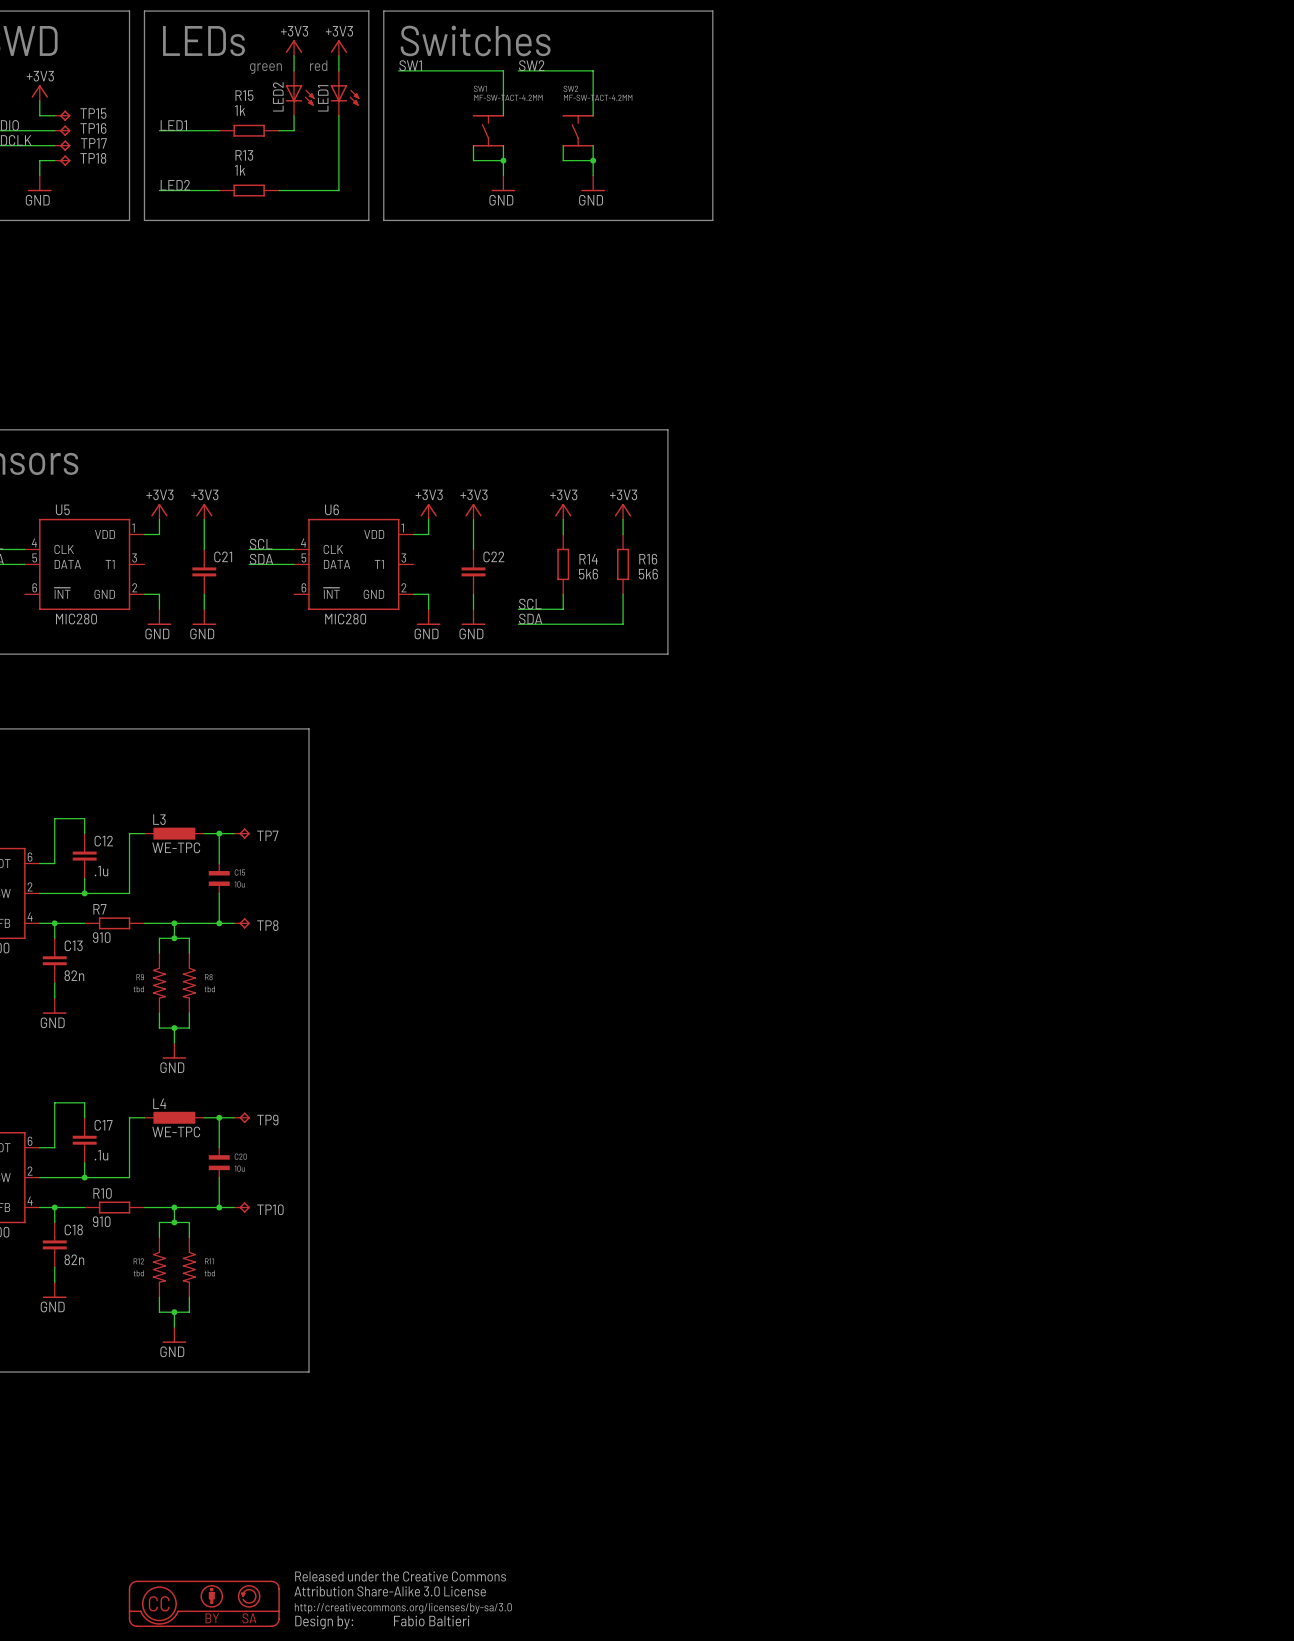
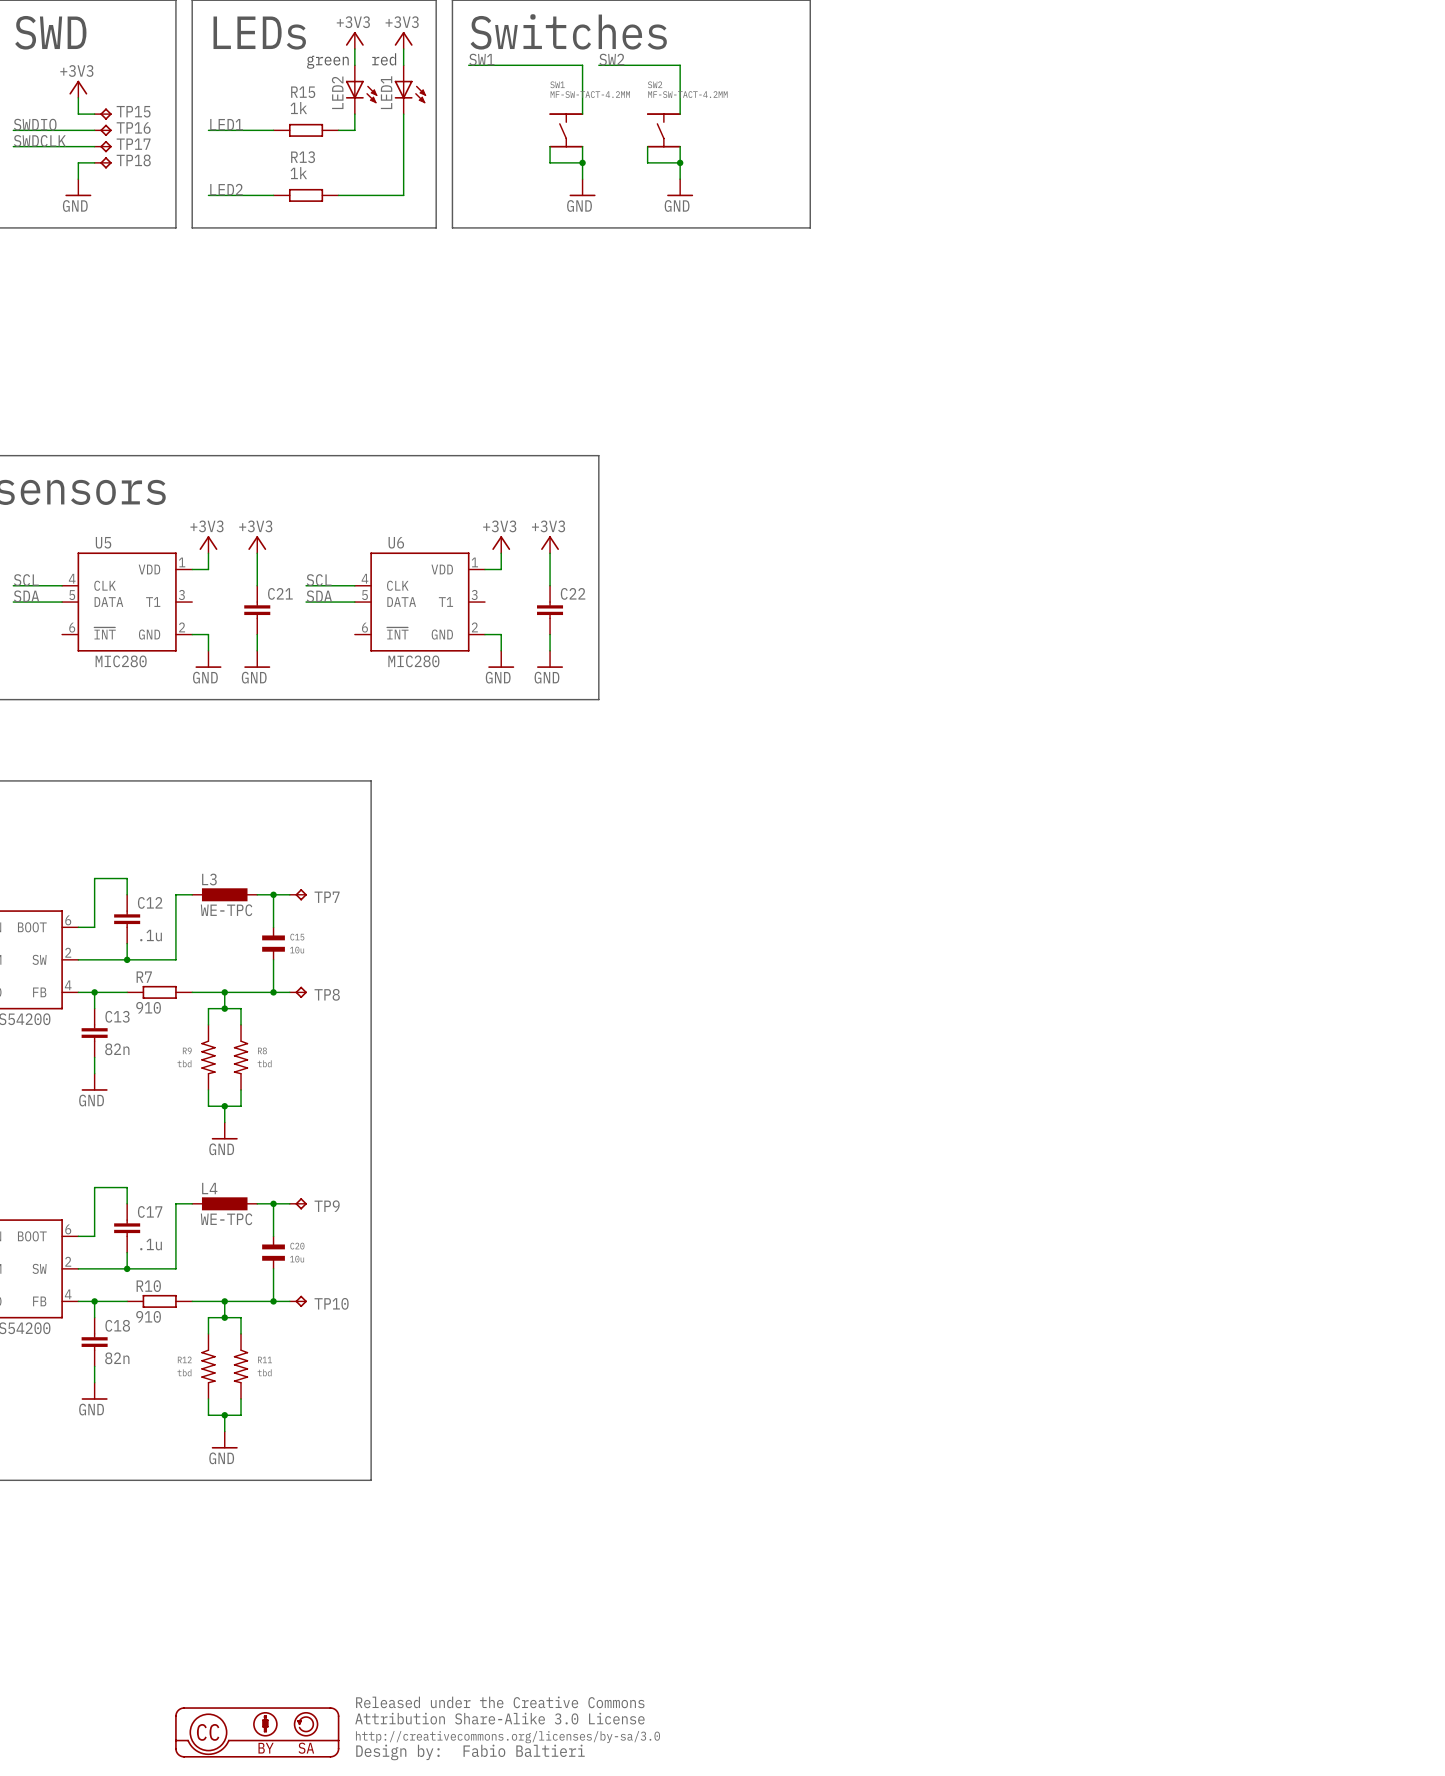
line: (518, 429) (667, 429) (667, 654) (518, 654) -> (598, 455) (598, 699)
power symbol: +3V3 (563, 511) -> none
power symbol: +3V3 (623, 511) -> none
wire: (563, 519) (563, 534) -> none
wire: (623, 519) (623, 534) -> none
R14: 5k6 (563, 564) -> none
R16: 5k6 (623, 564) -> none
wire: (563, 594) (563, 609) (518, 609) -> none
wire: (623, 594) (623, 624) (518, 624) -> none
label: SCL (530, 604) -> none
label: SDA (530, 619) -> none

